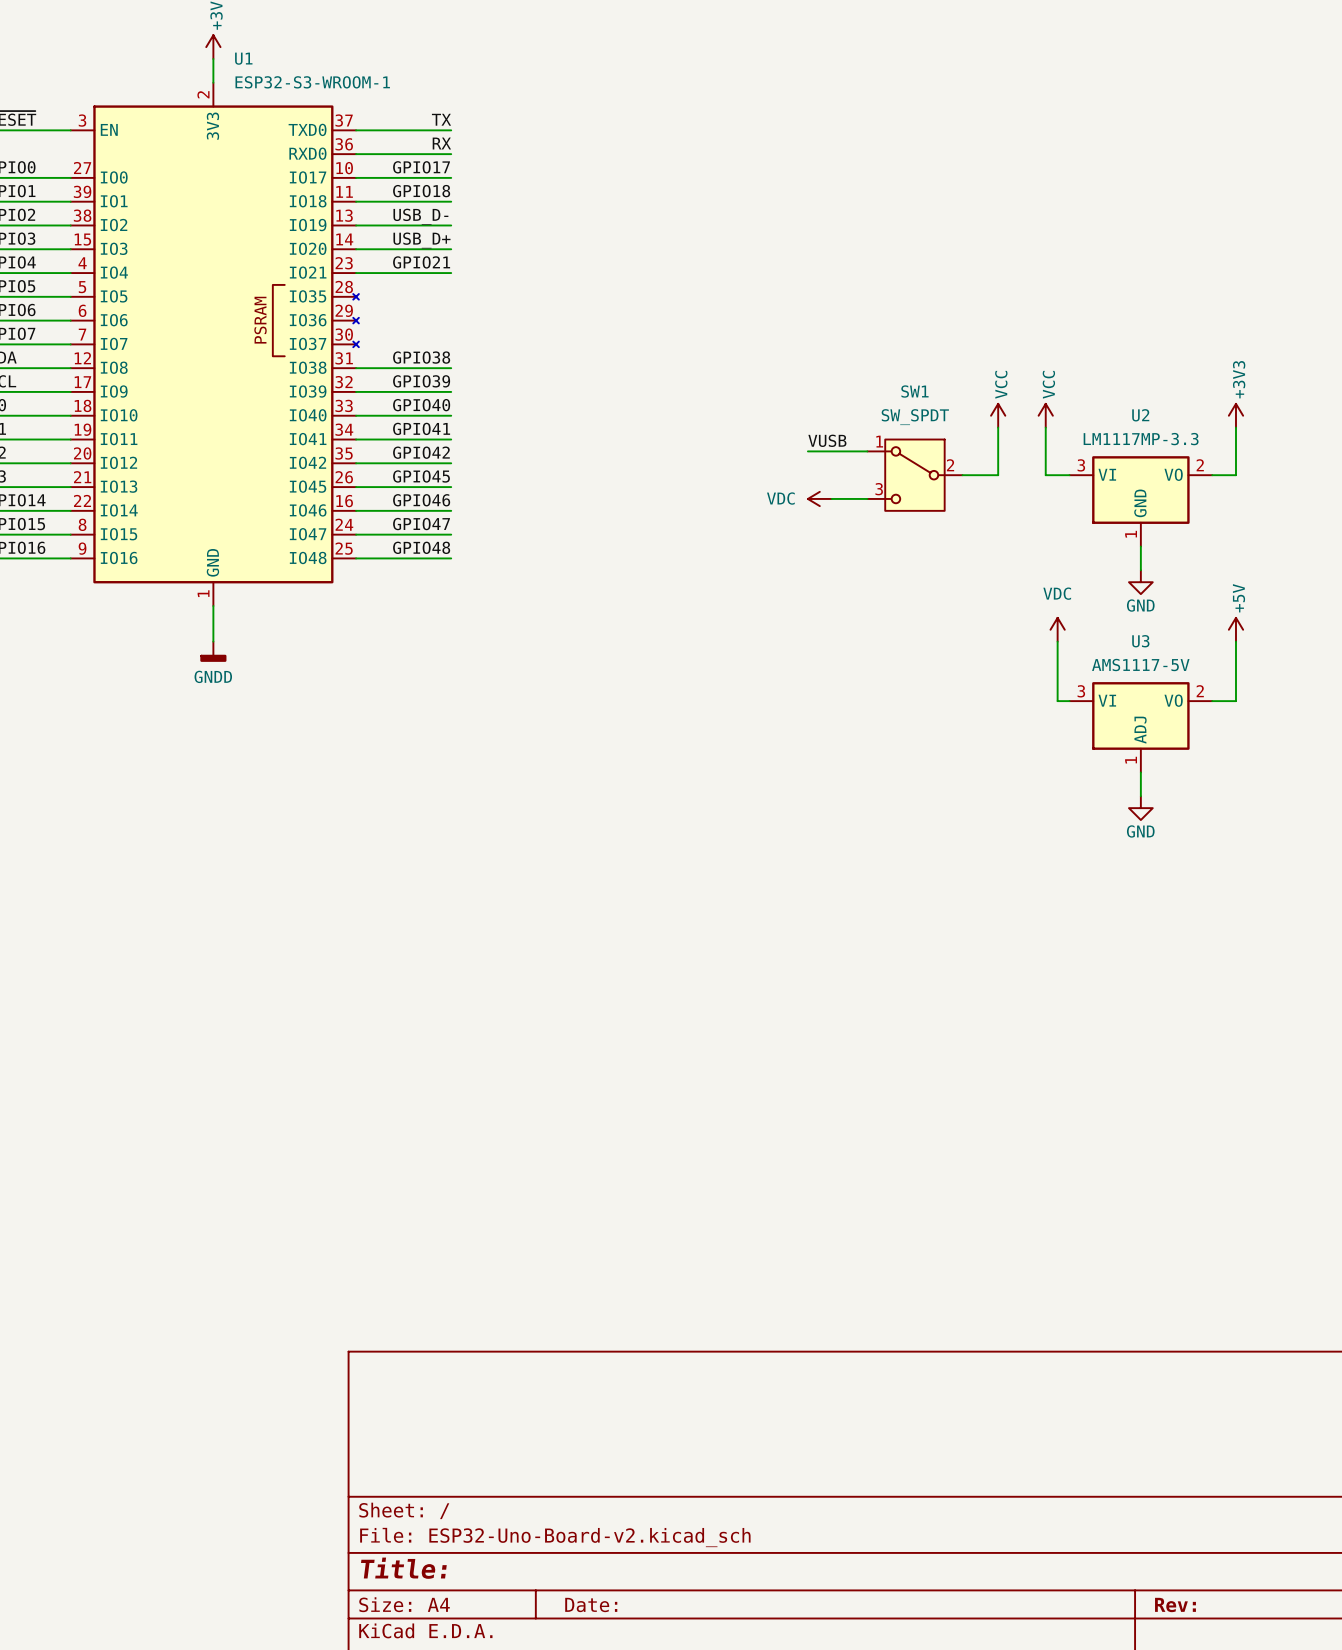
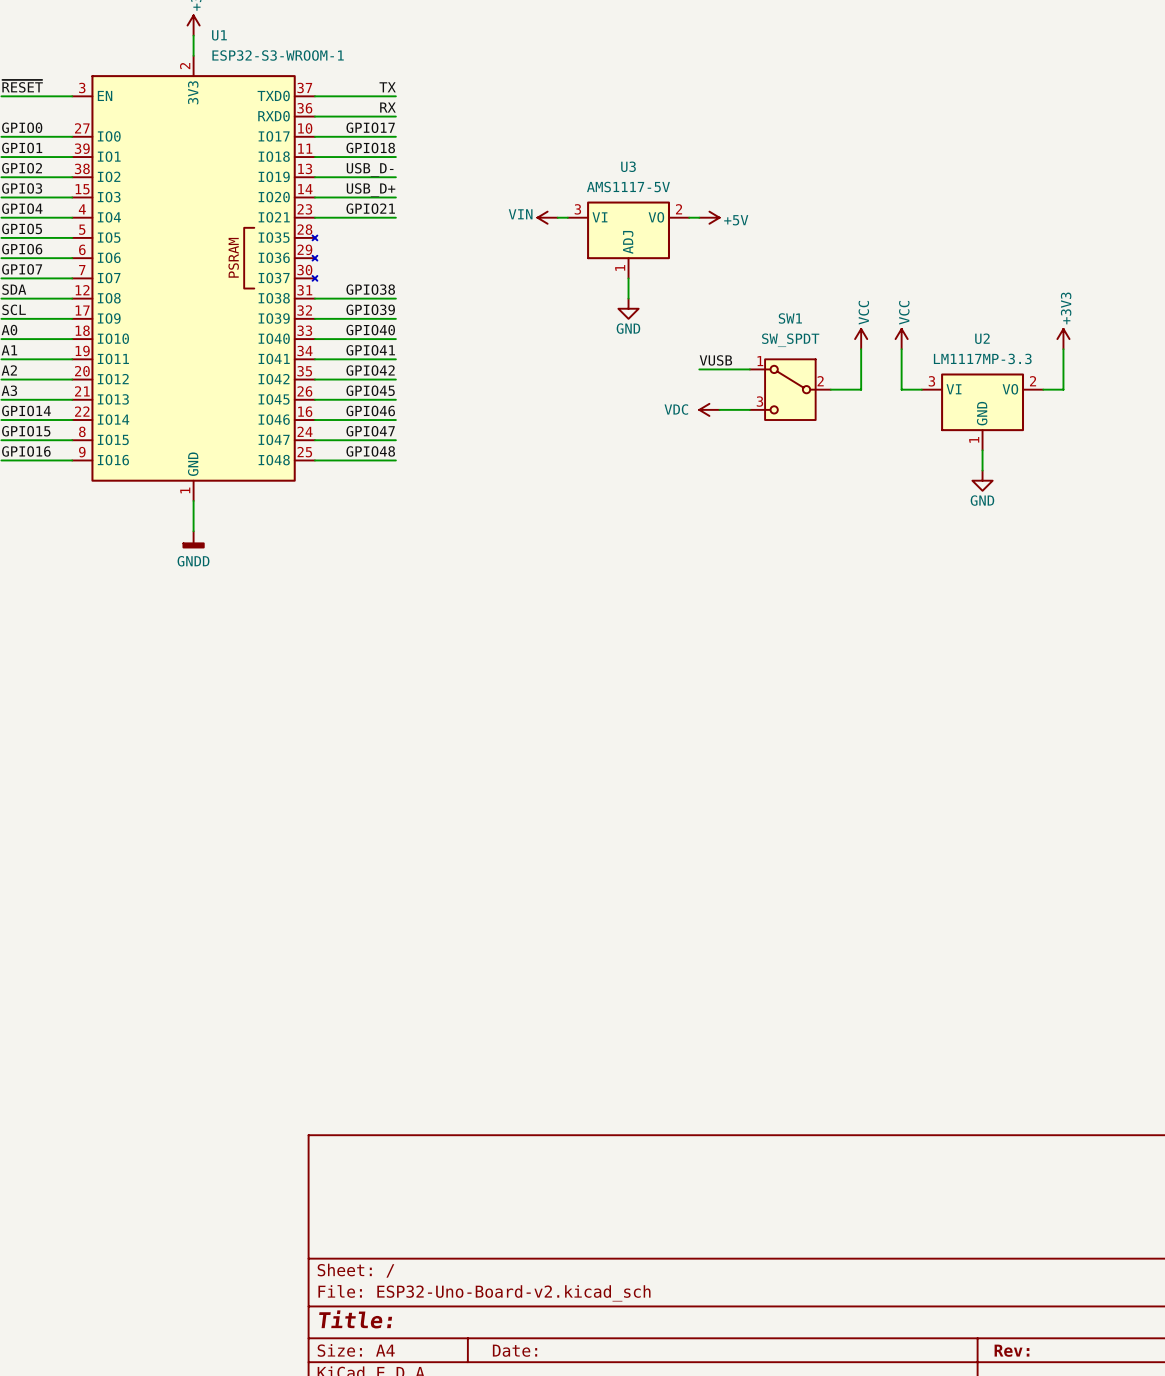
power symbol: none -> VIN (547, 217)
wire: none -> (557, 217) (567, 217)
wire: none -> (689, 217) (699, 217)
power symbol: none -> +5V (709, 217)
wire: none -> (628, 278) (628, 298)
power symbol: none -> GND (628, 308)
power symbol: VDC (1057, 629) -> none
power symbol: +5V (1235, 629) -> none
wire: (1057, 641) (1057, 701) (1069, 701) -> none
wire: (1235, 641) (1235, 701) (1212, 701) -> none
U3 position: (1140, 727) -> (628, 239)
wire: (1140, 772) (1140, 796) -> none
power symbol: GND (1140, 808) -> none

